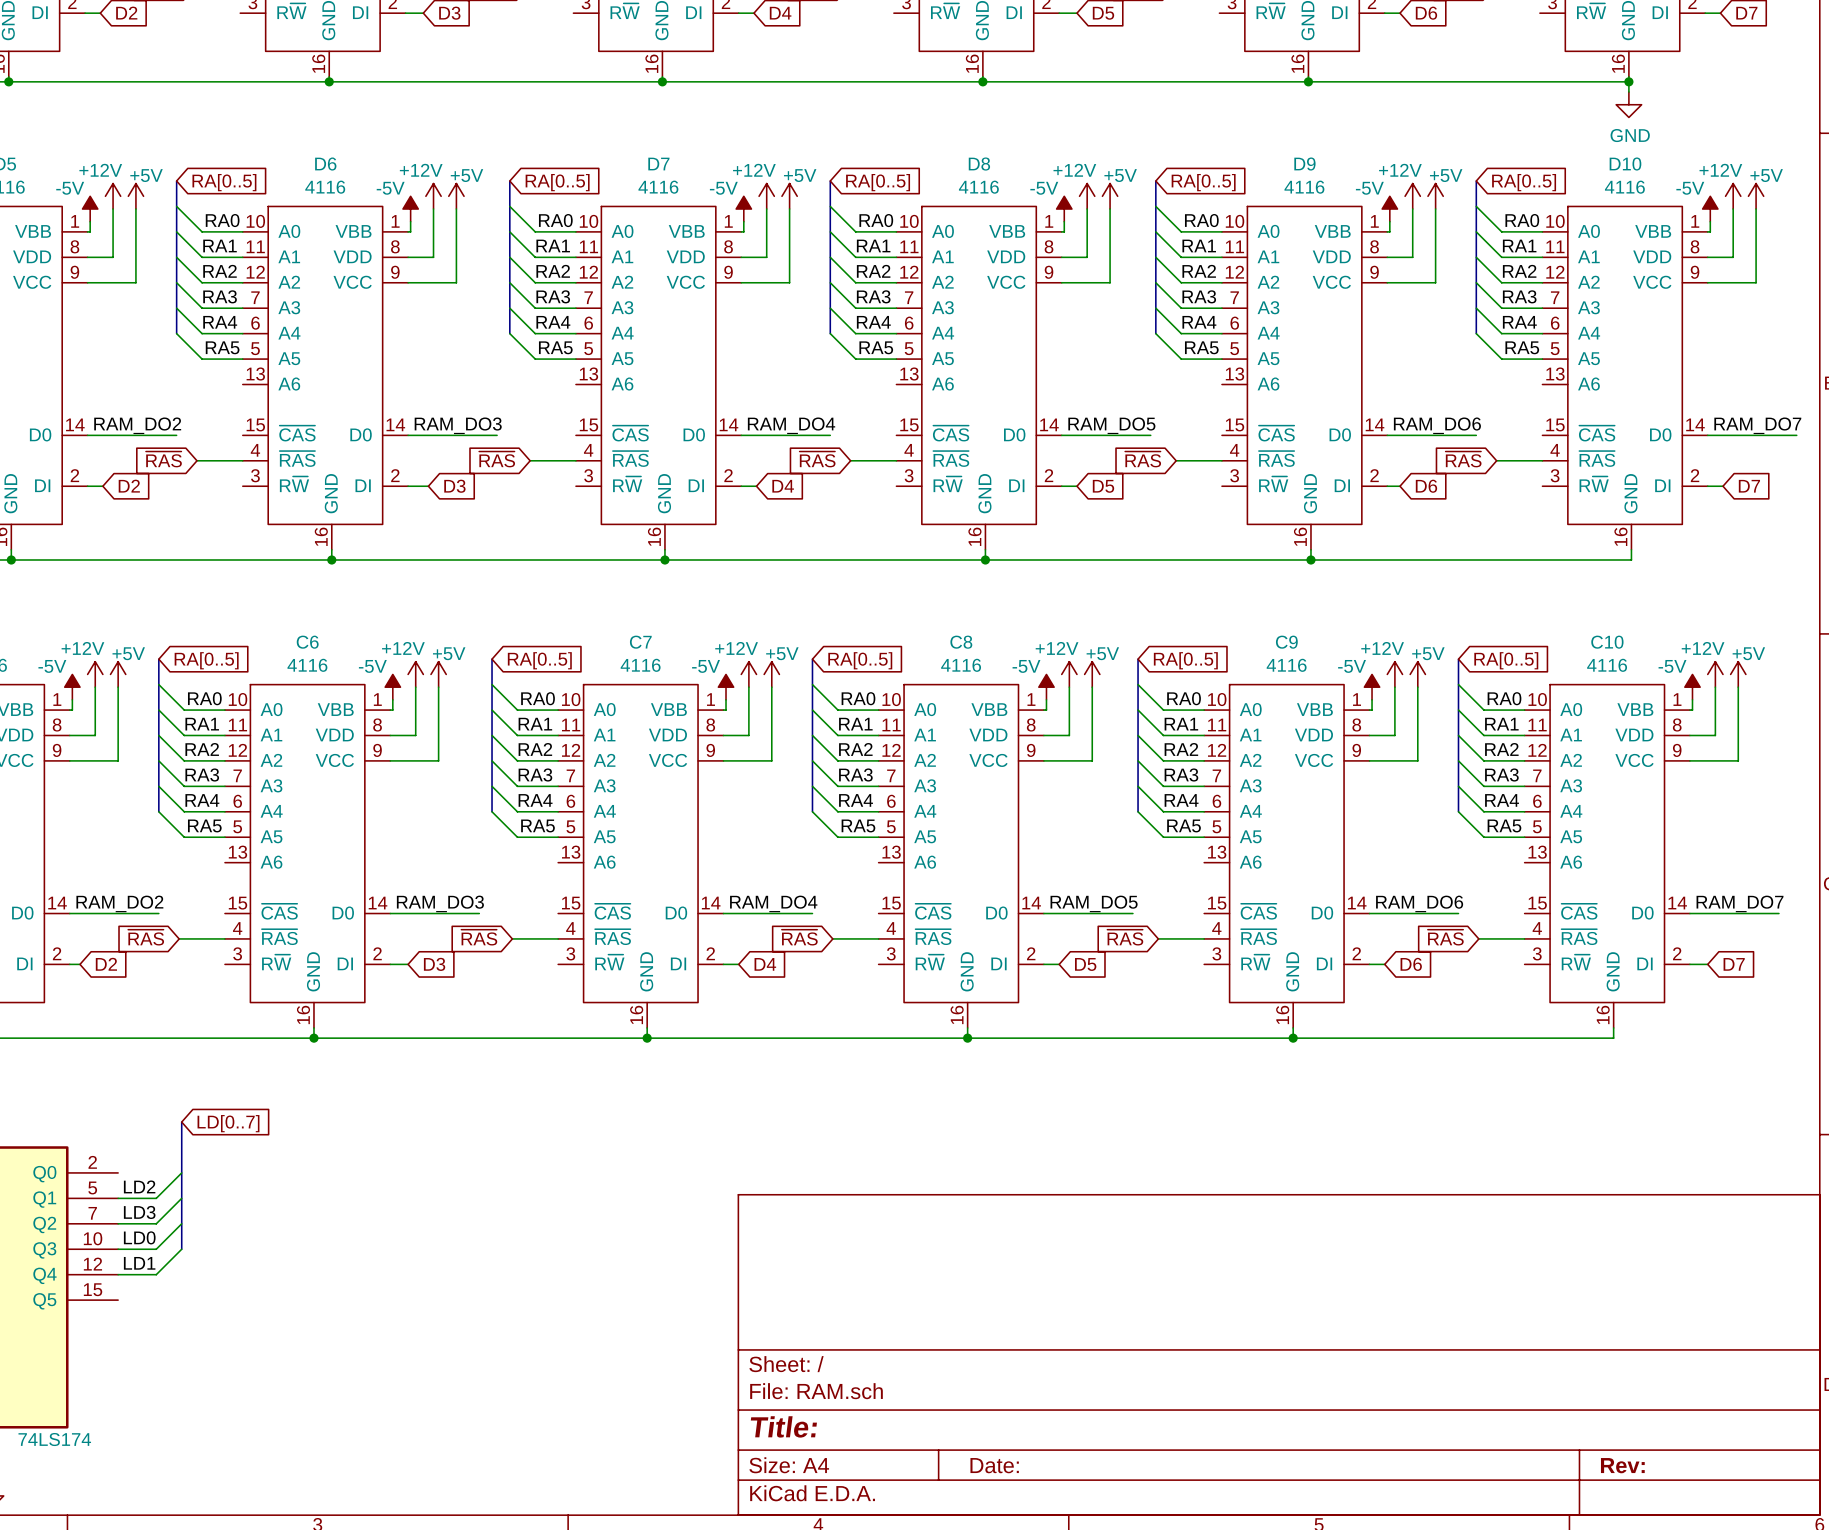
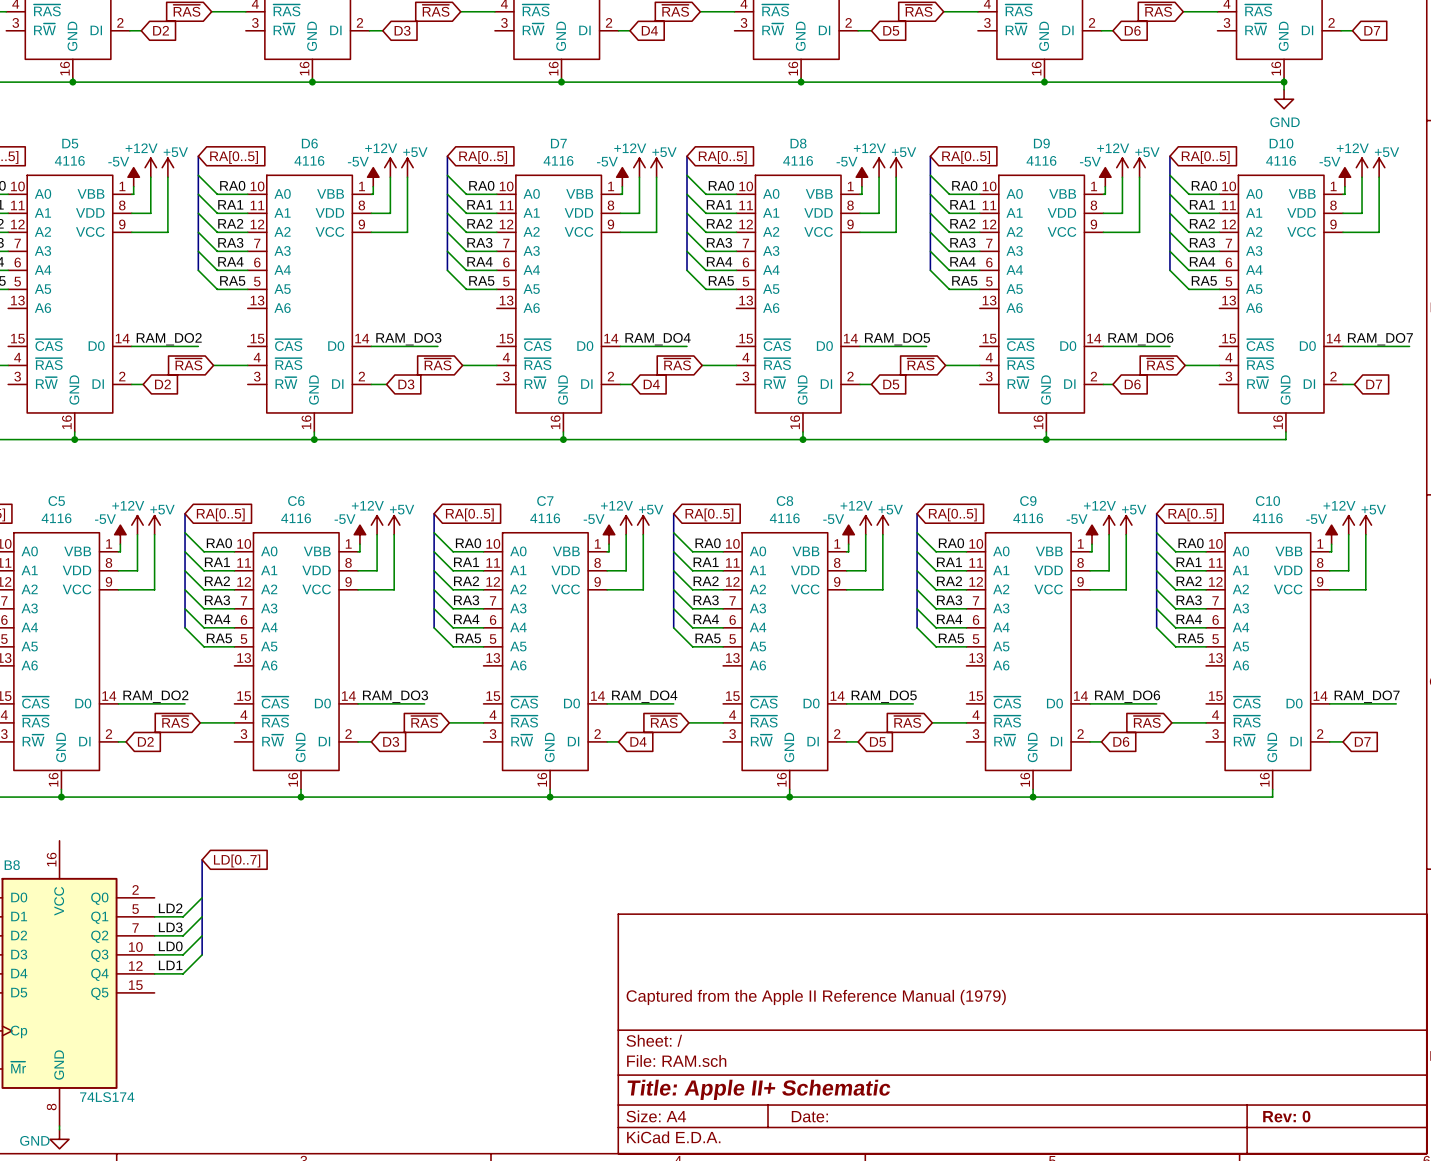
title block: none -> Captured from the Apple II Reference Manual (1979) (816, 997)
title block: Title: (783, 1426) -> Title: Apple II+ Schematic (758, 1089)
title block: Rev: (1622, 1465) -> Rev: 0 (1286, 1116)

